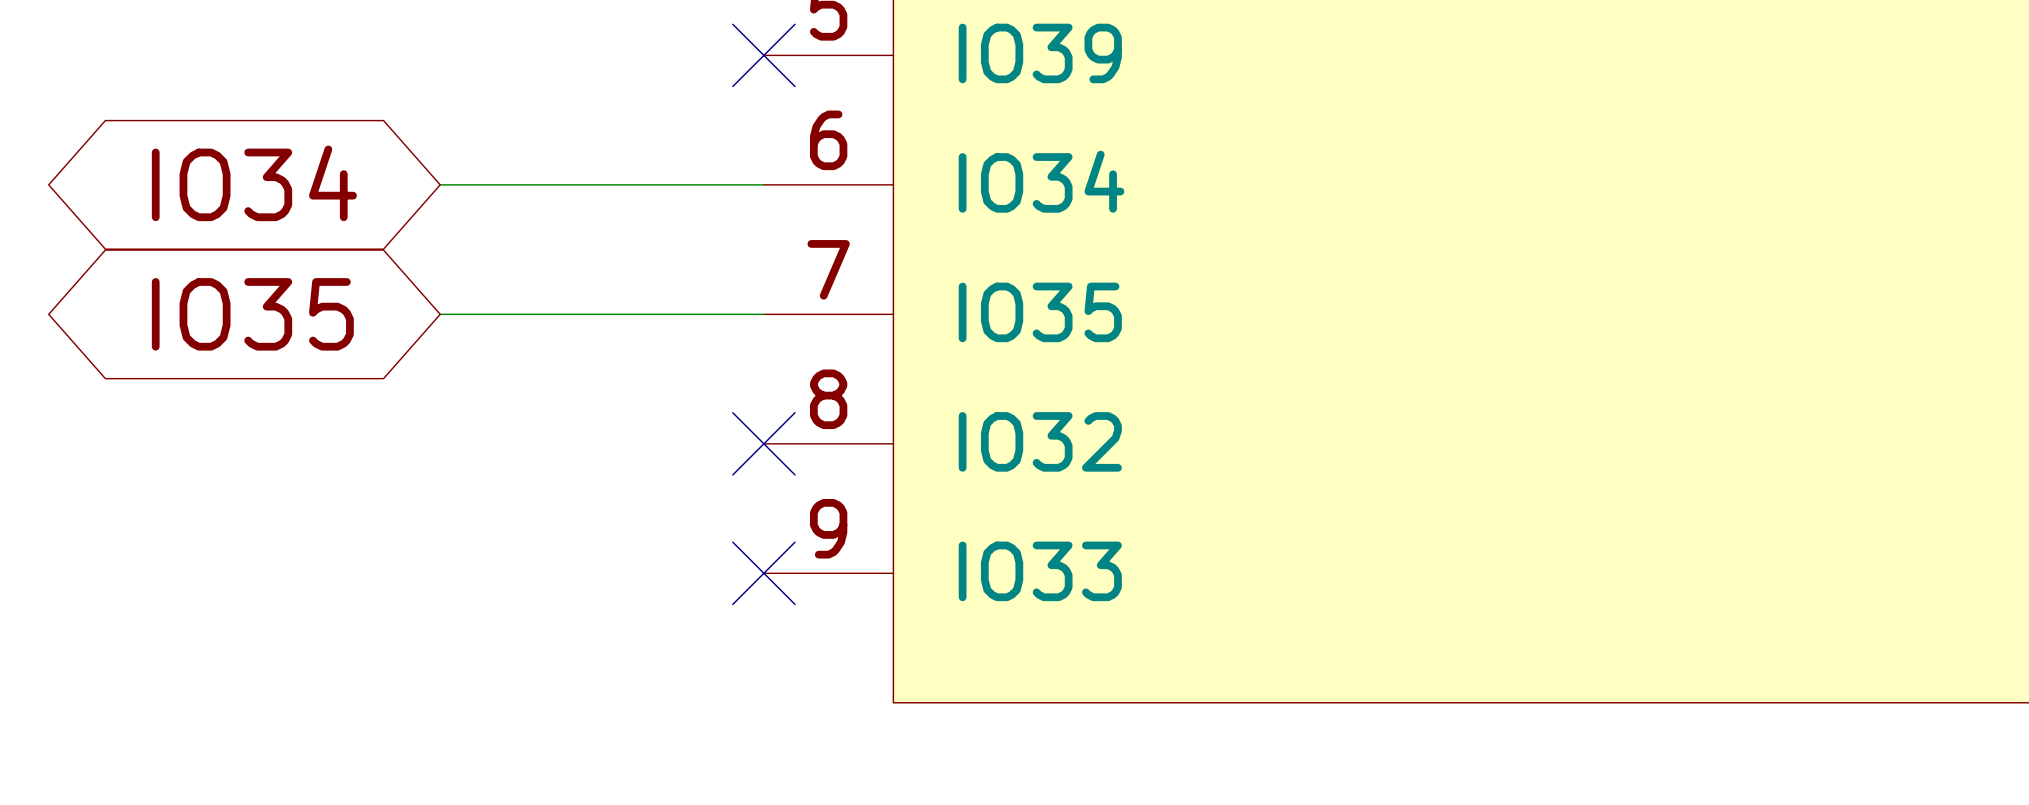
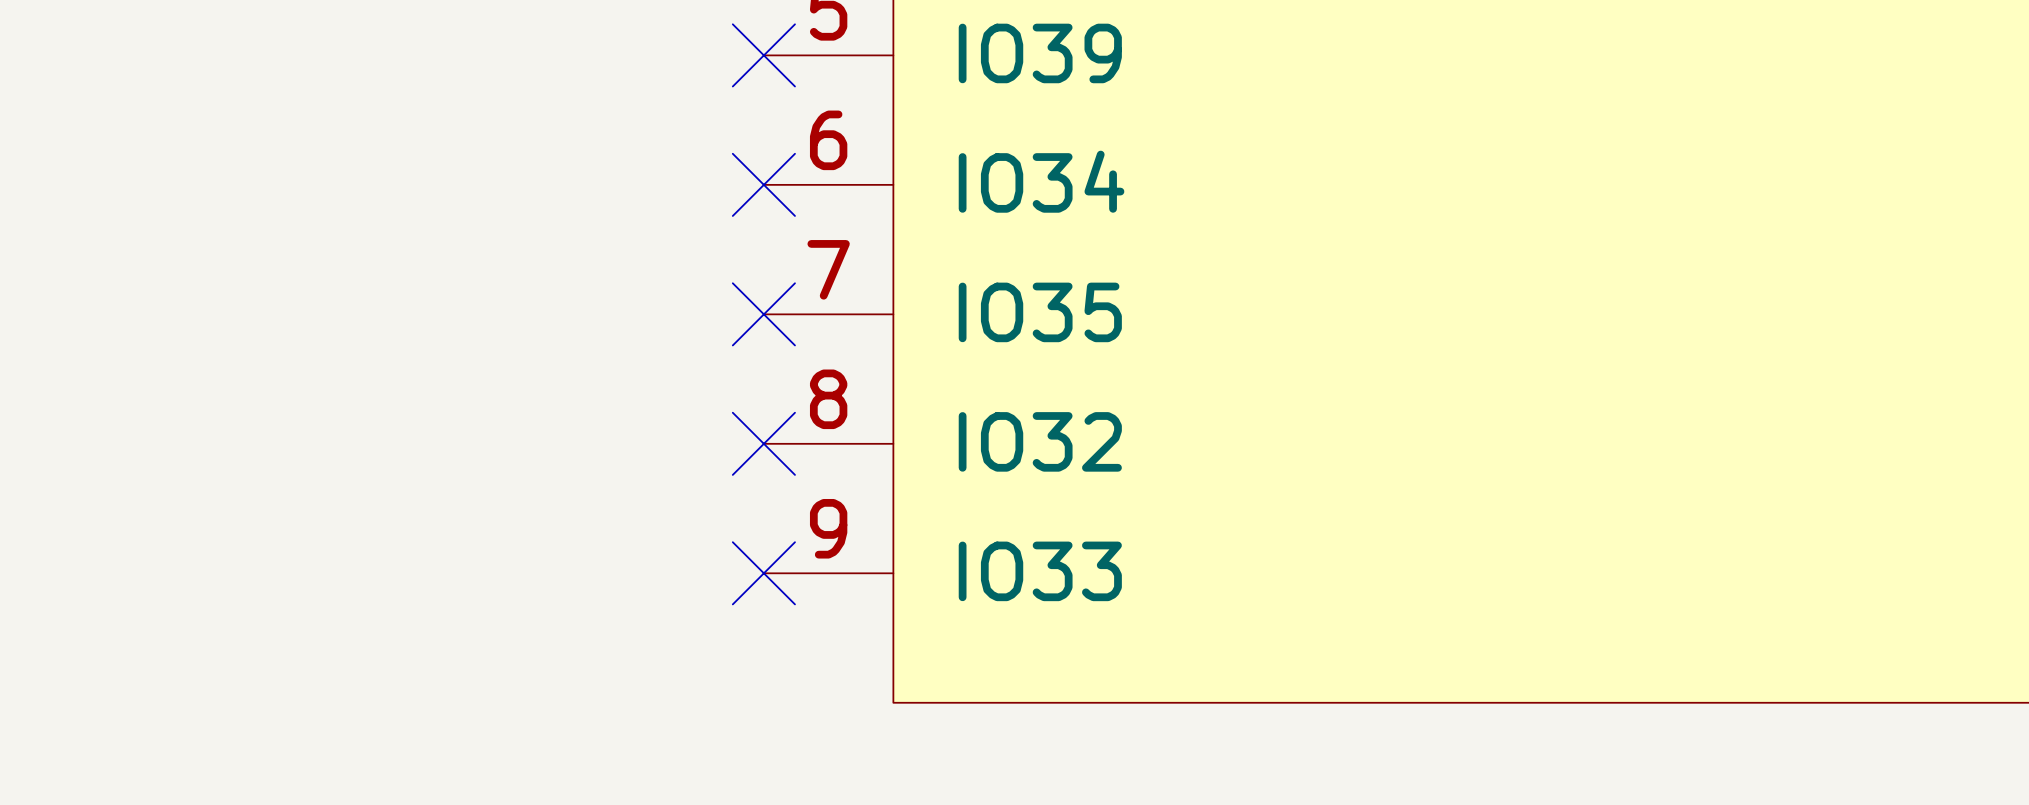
global label: IO34 (254, 183) -> none
wire: (440, 184) (763, 184) -> none
no-connect mark: none -> (763, 184)
global label: IO35 (252, 314) -> none
wire: (440, 314) (763, 314) -> none
no-connect mark: none -> (763, 314)

